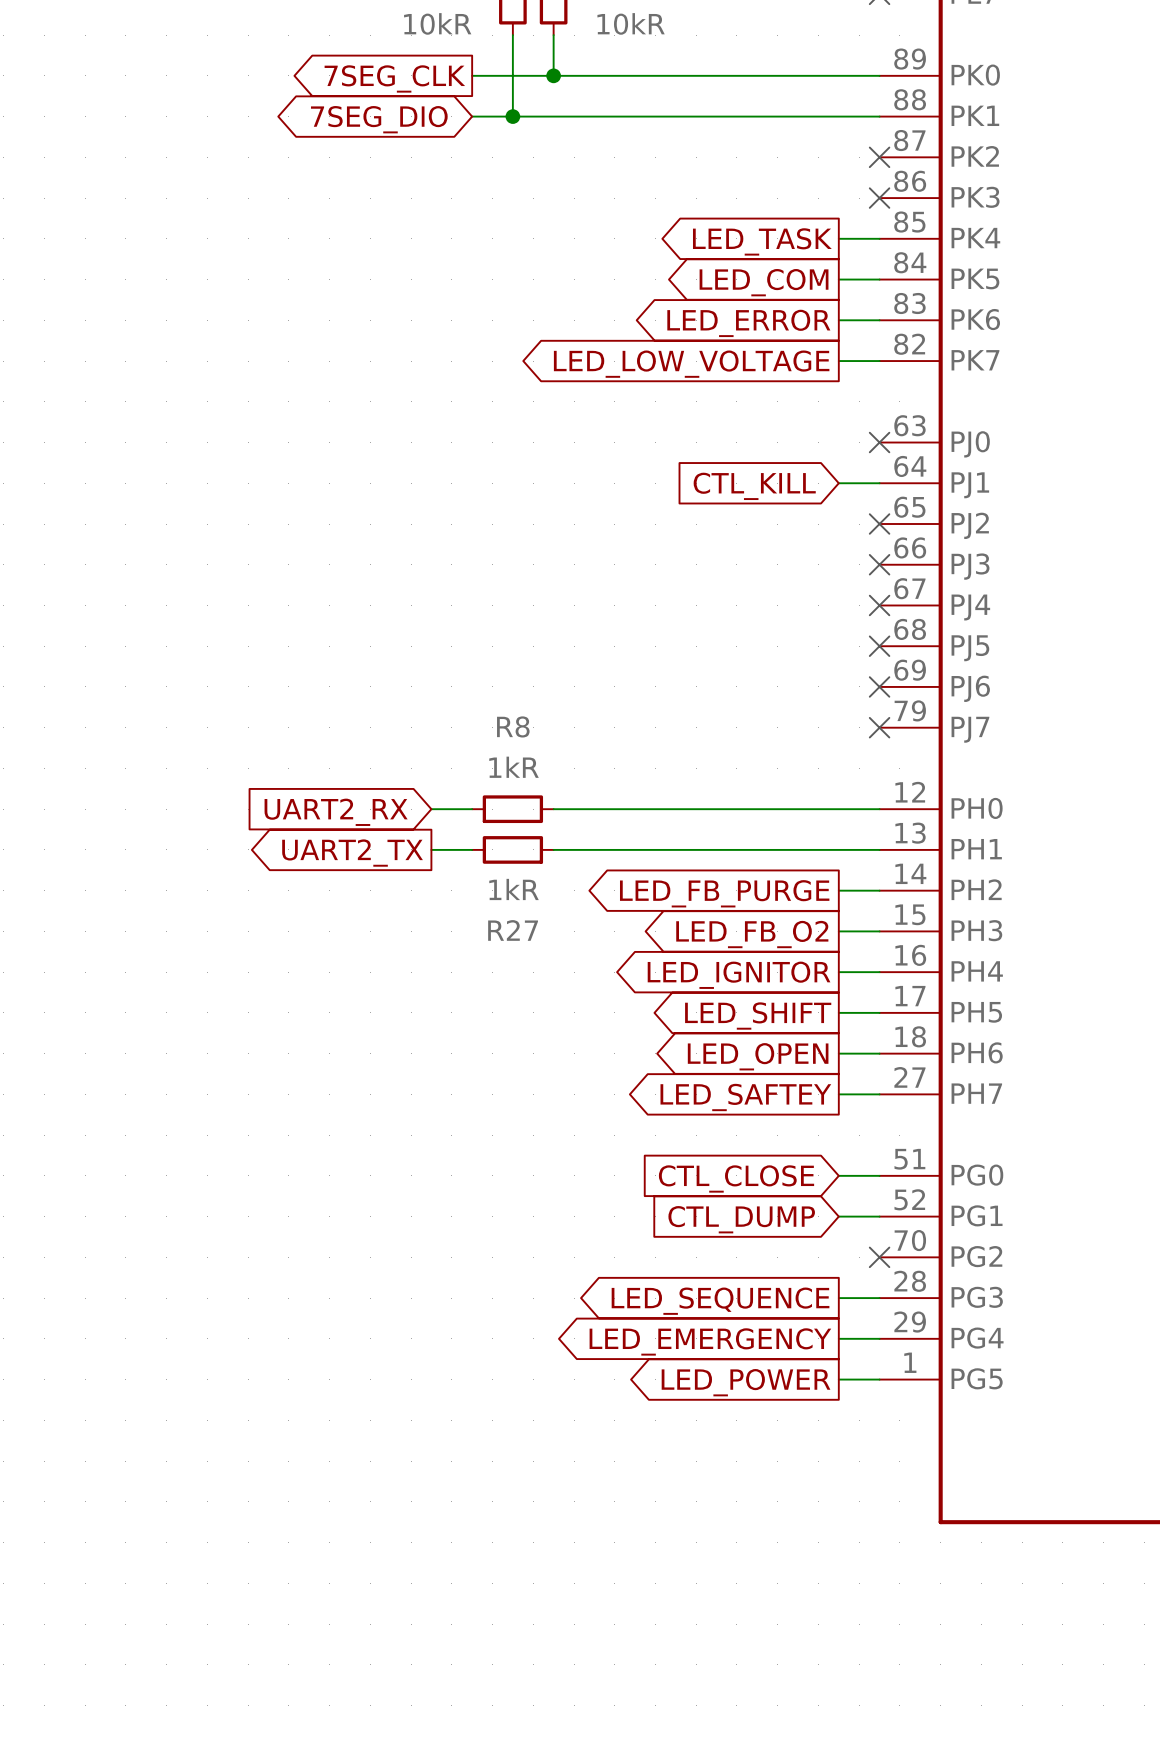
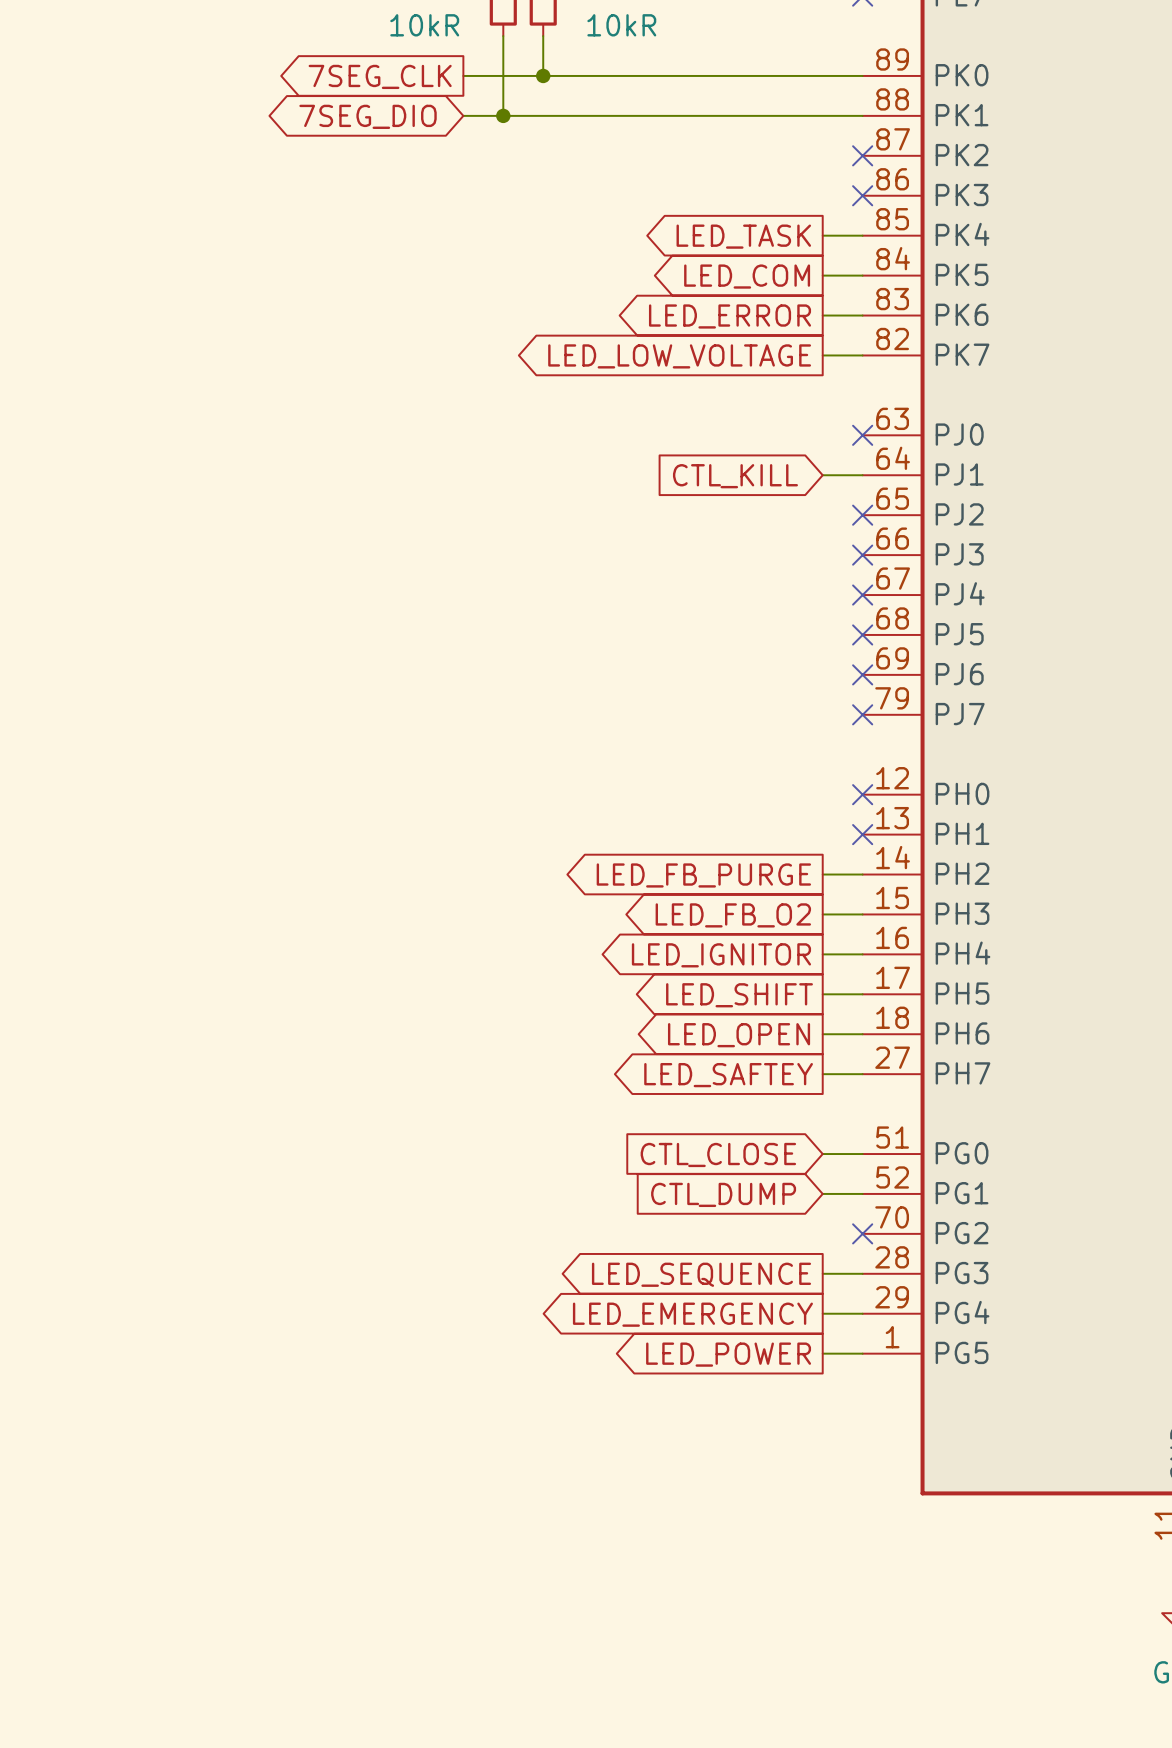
wire: (431, 809) (472, 809) -> none
R8: 1kR (512, 809) -> none
wire: (553, 809) (879, 809) -> none
no-connect mark: none -> (862, 794)
global label: UART2_RX (336, 812) -> none
wire: (431, 849) (472, 849) -> none
R27: 1kR (512, 849) -> none
wire: (553, 849) (879, 849) -> none
no-connect mark: none -> (862, 834)
global label: UART2_TX (352, 853) -> none

